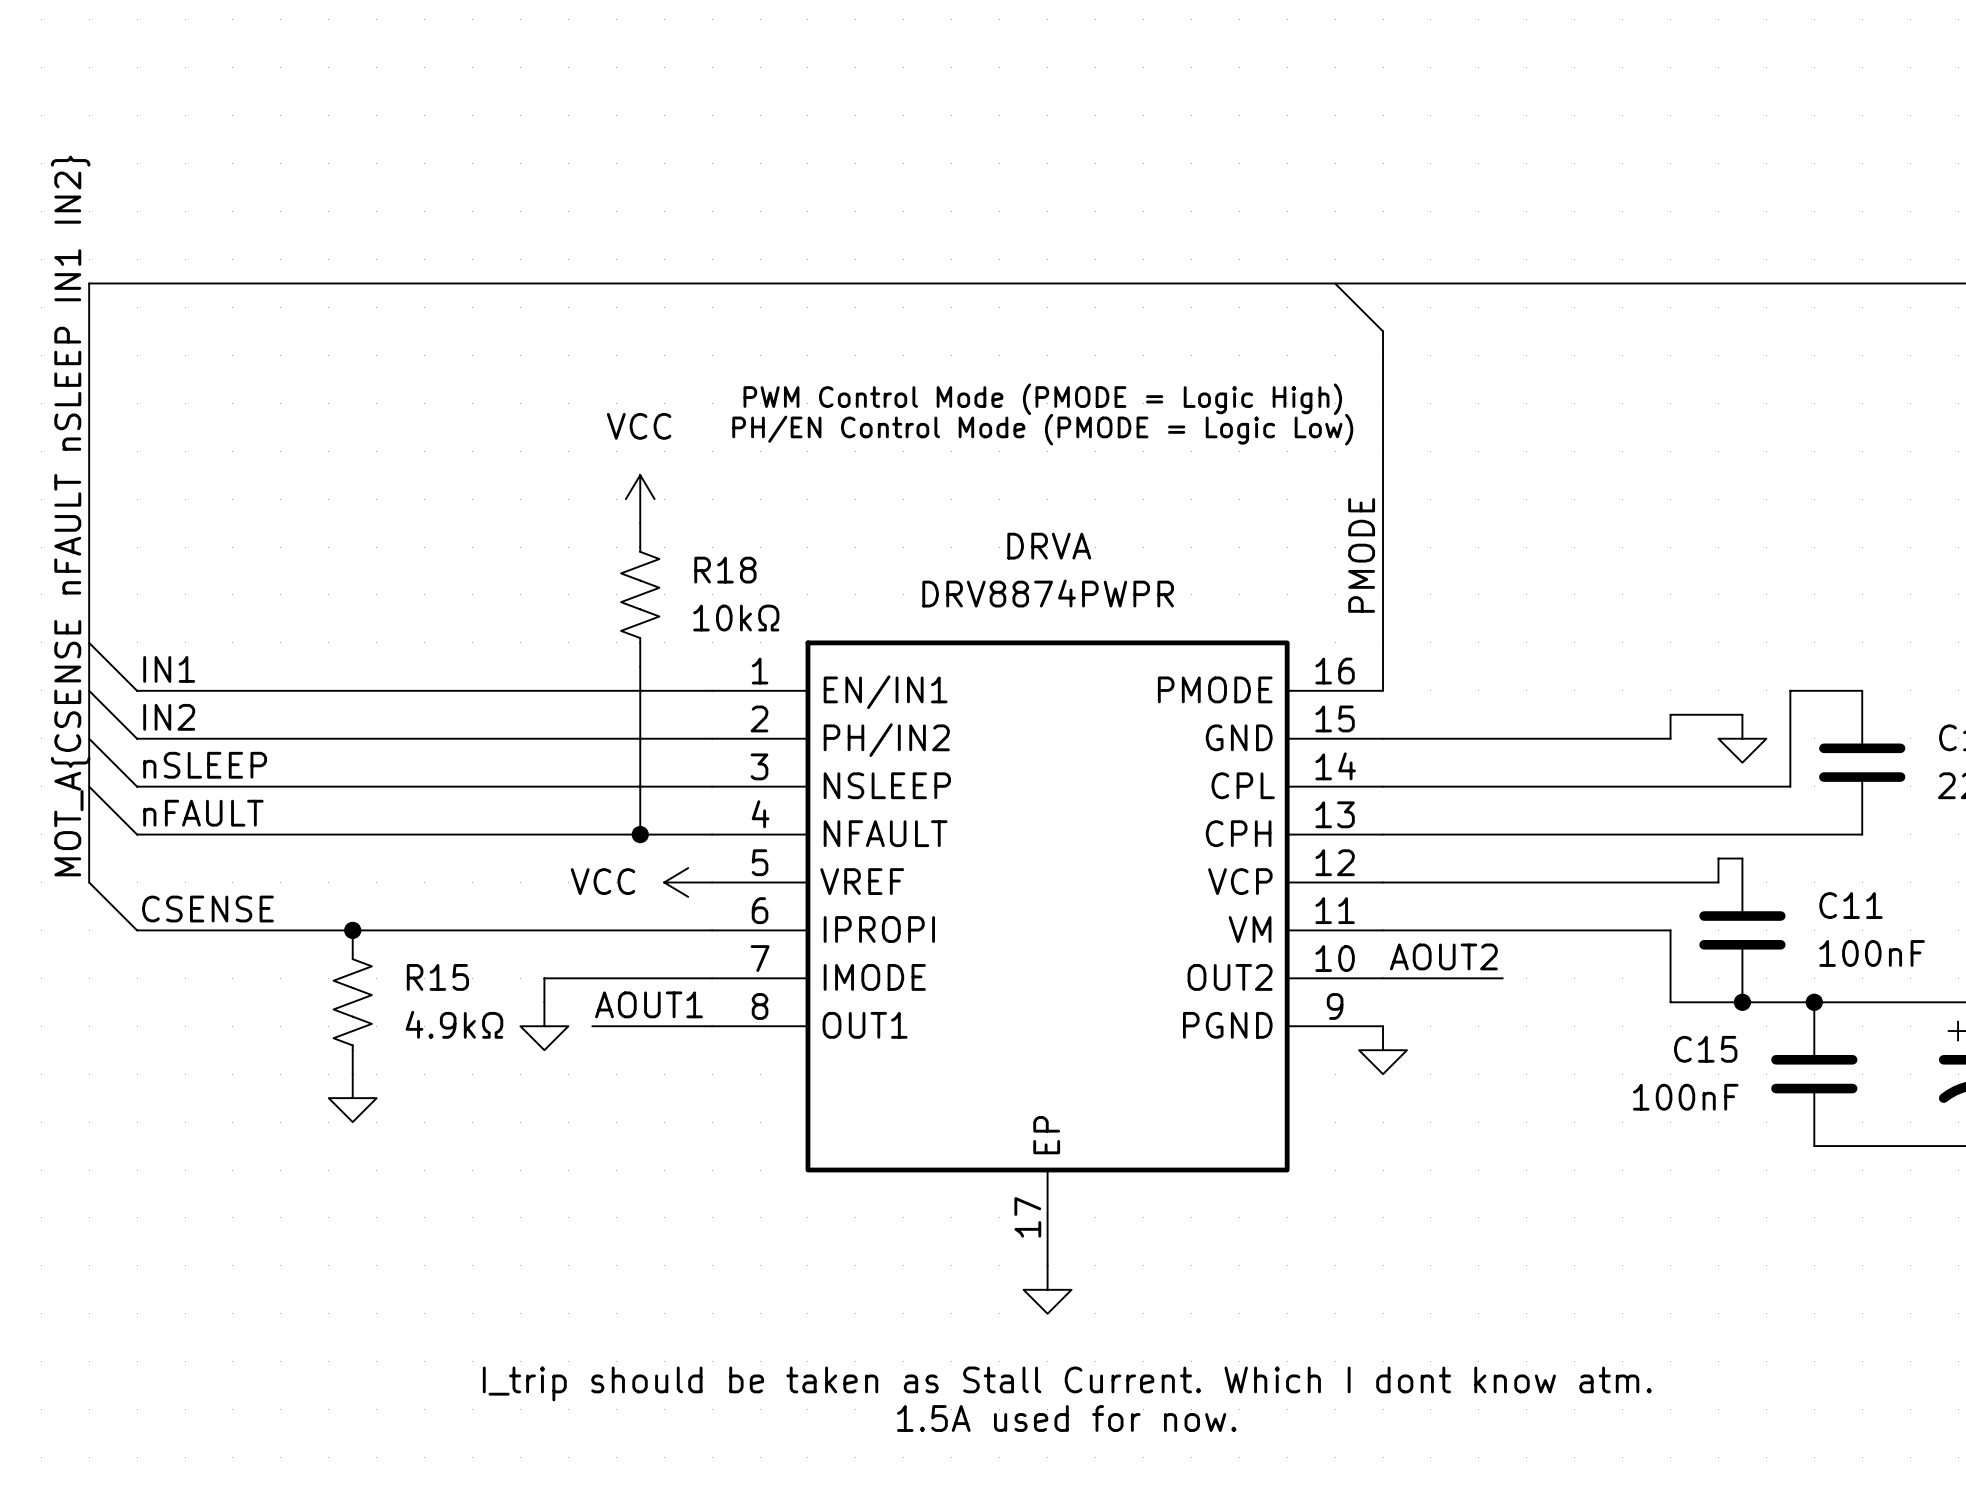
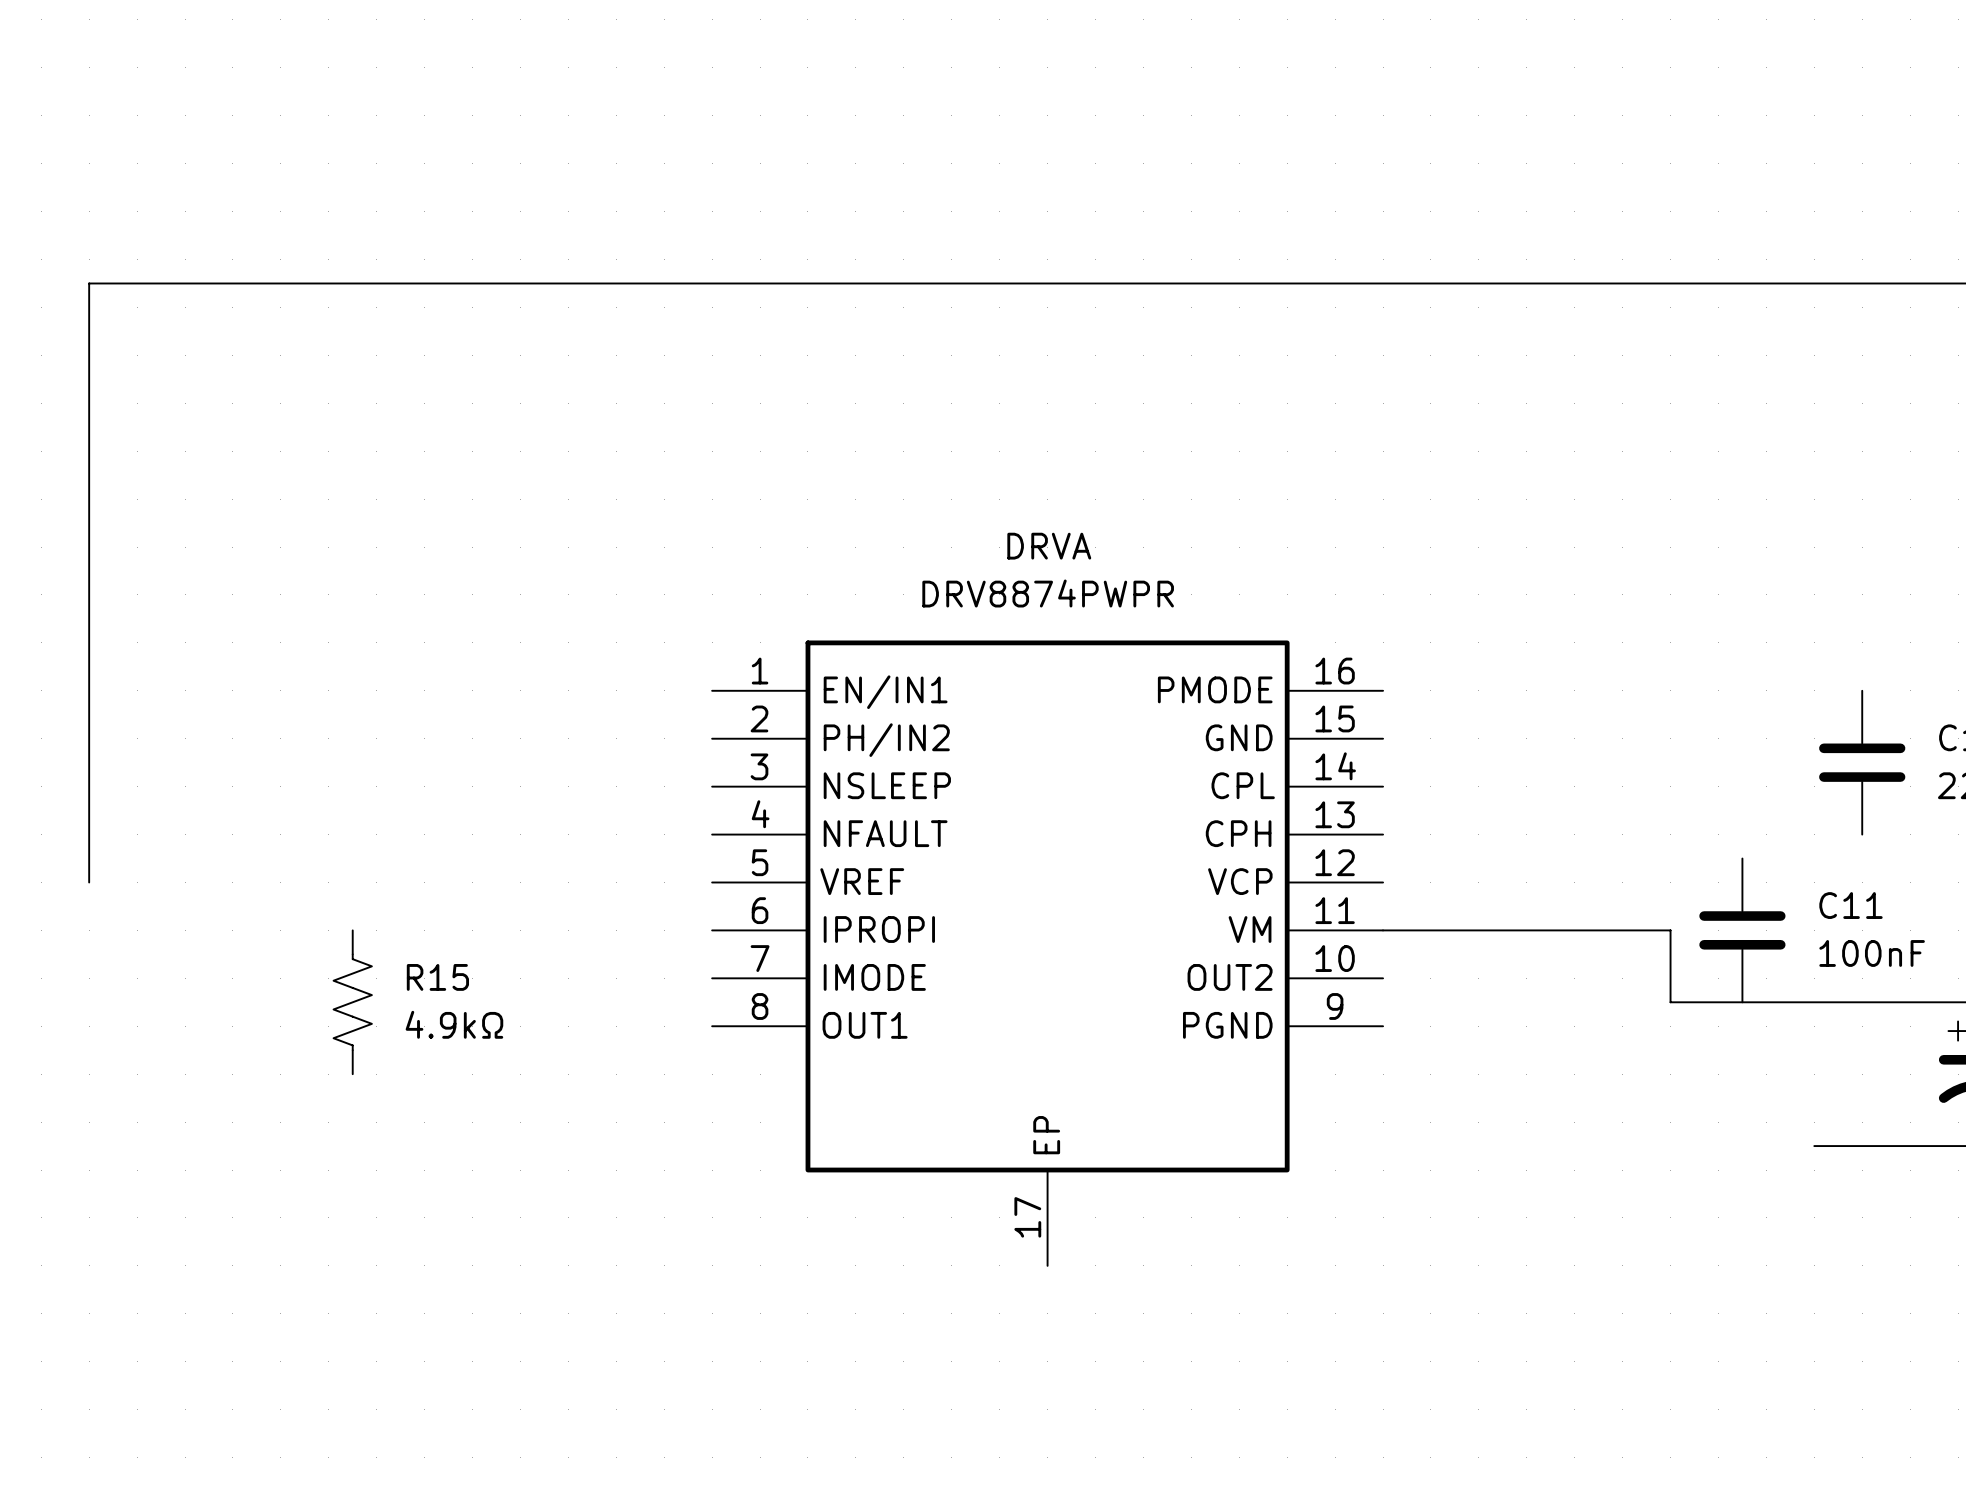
wire: (1335, 283) (1383, 331) (1383, 690) -> none
text: PWM Control Mode (PMODE = Logic High) (1042, 399) -> none
text: PH/EN Control Mode (PMODE = Logic Low) (1042, 429) -> none
power symbol: VCC (640, 499) -> none
label: MOT_A{CSENSE nFAULT nSLEEP IN1 IN2} (70, 515) -> none
label: PMODE (1361, 555) -> none
R18: 10kΩ (640, 594) -> none
wire: (89, 642) (137, 690) (712, 690) -> none
wire: (640, 666) (640, 834) -> none
label: IN1 (169, 669) -> none
wire: (89, 690) (137, 738) (712, 738) -> none
wire: (1862, 690) (1790, 690) (1790, 786) (1383, 786) -> none
wire: (1742, 714) (1670, 714) (1670, 738) (1383, 738) -> none
label: IN2 (169, 717) -> none
wire: (89, 738) (137, 786) (712, 786) -> none
power symbol: (1742, 738) -> none
label: nSLEEP (205, 765) -> none
wire: (89, 786) (137, 834) (712, 834) -> none
label: nFAULT (203, 813) -> none
junction: (640, 834) -> none
wire: (1383, 834) (1862, 834) -> none
wire: (1742, 858) (1718, 858) (1718, 882) (1383, 882) -> none
wire: (89, 882) (137, 930) (712, 930) -> none
power symbol: VCC (688, 882) -> none
label: CSENSE (208, 909) -> none
junction: (352, 930) -> none
label: AOUT2 (1443, 956) -> none
wire: (712, 978) (544, 978) (544, 1002) -> none
wire: (1383, 978) (1502, 978) -> none
junction: (1742, 1002) -> none
junction: (1814, 1002) -> none
label: AOUT1 (648, 1004) -> none
power symbol: (544, 1026) -> none
wire: (592, 1026) (712, 1026) -> none
power symbol: (1383, 1050) -> none
C15: 100nF (1814, 1074) -> none
power symbol: (352, 1098) -> none
power symbol: (1047, 1289) -> none
text: I_trip should be taken as Stall Current. Which I dont know atm. (1067, 1383) -> none
text: 1.5A used for now. (1066, 1418) -> none

